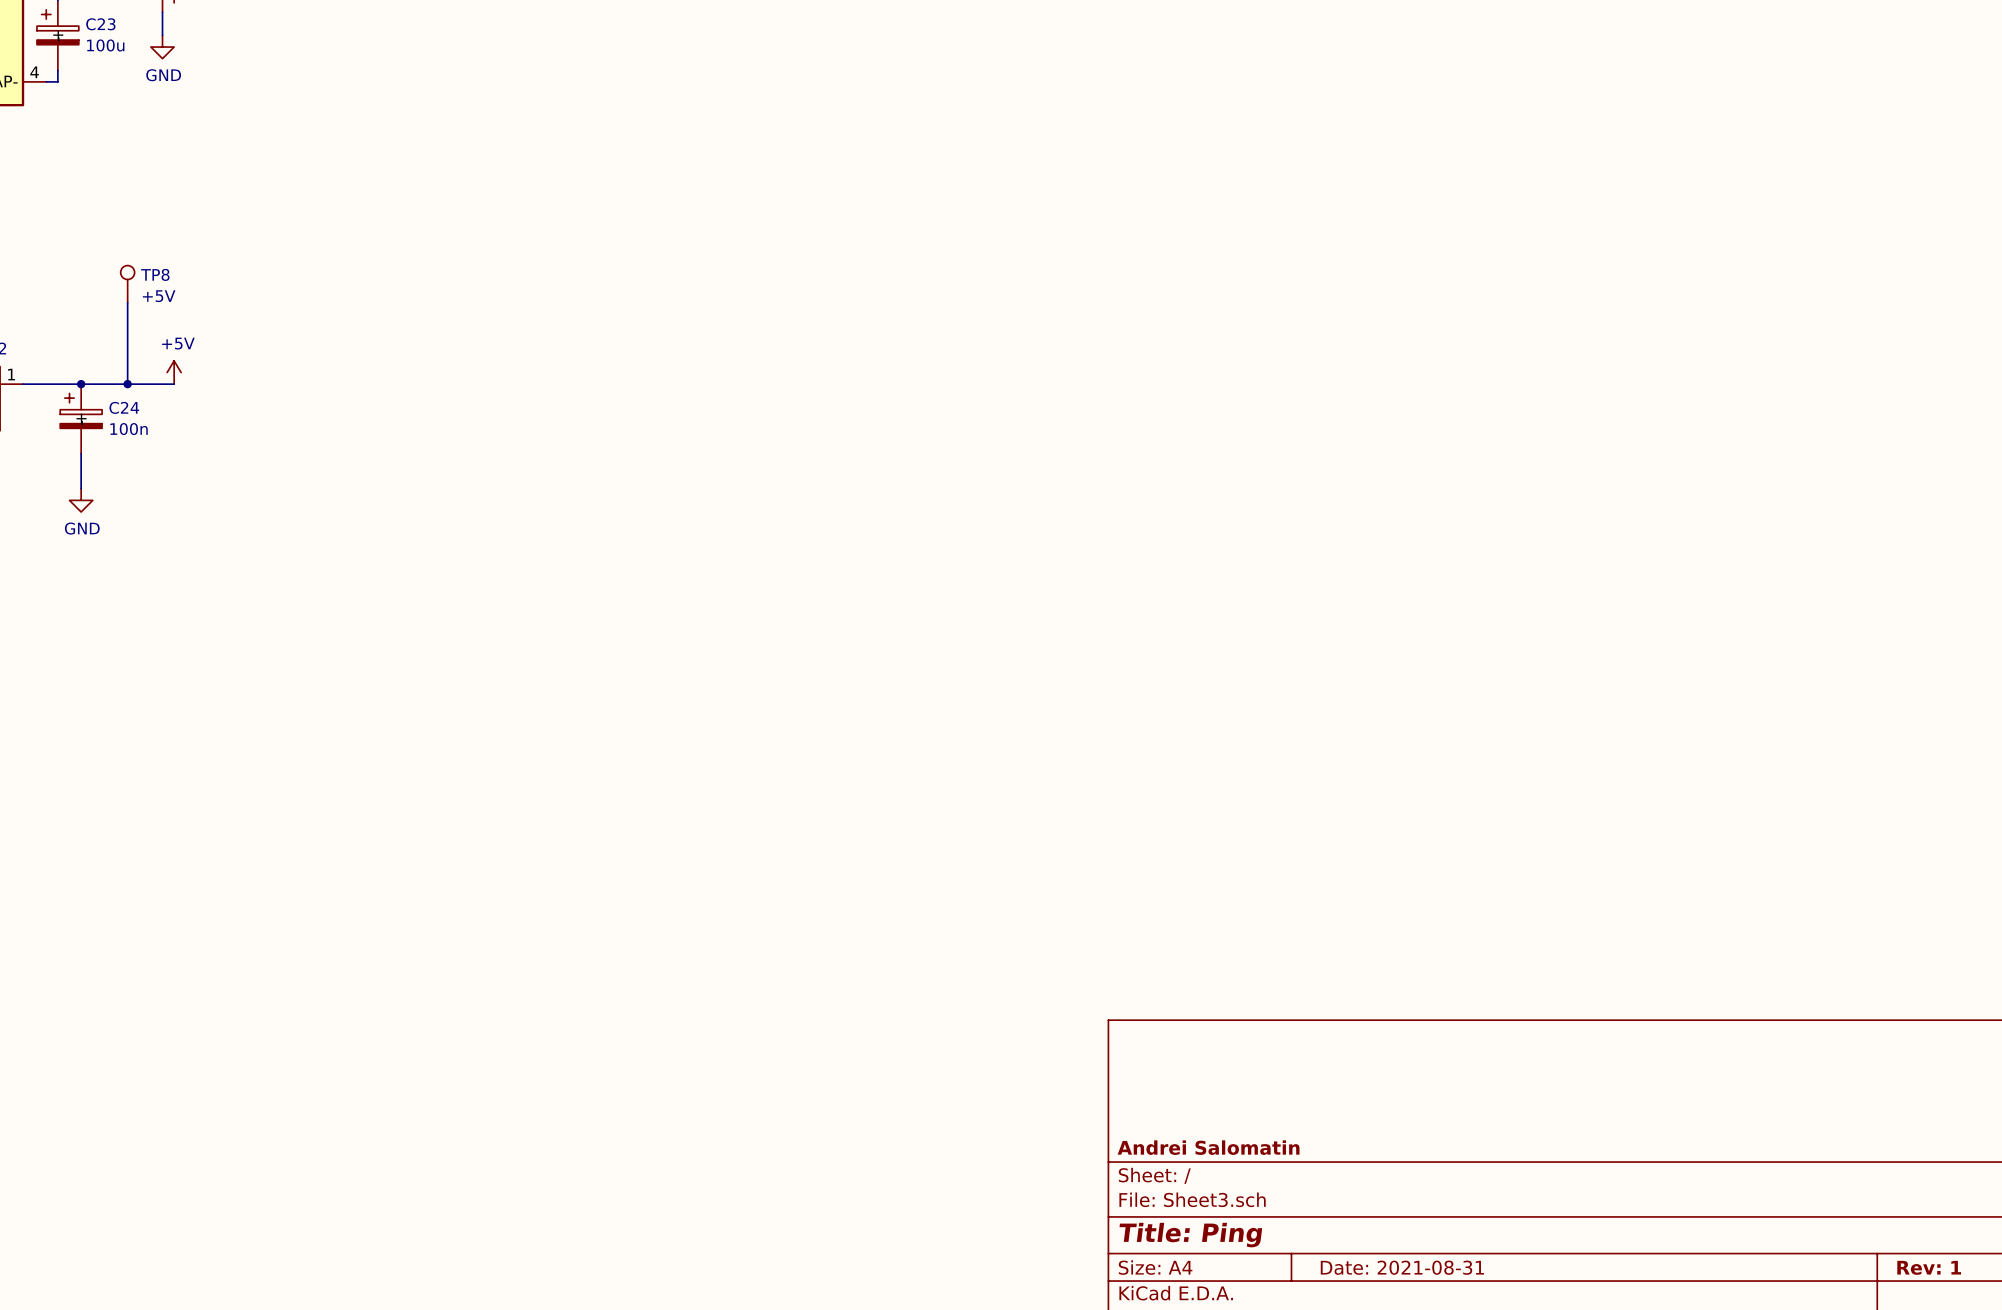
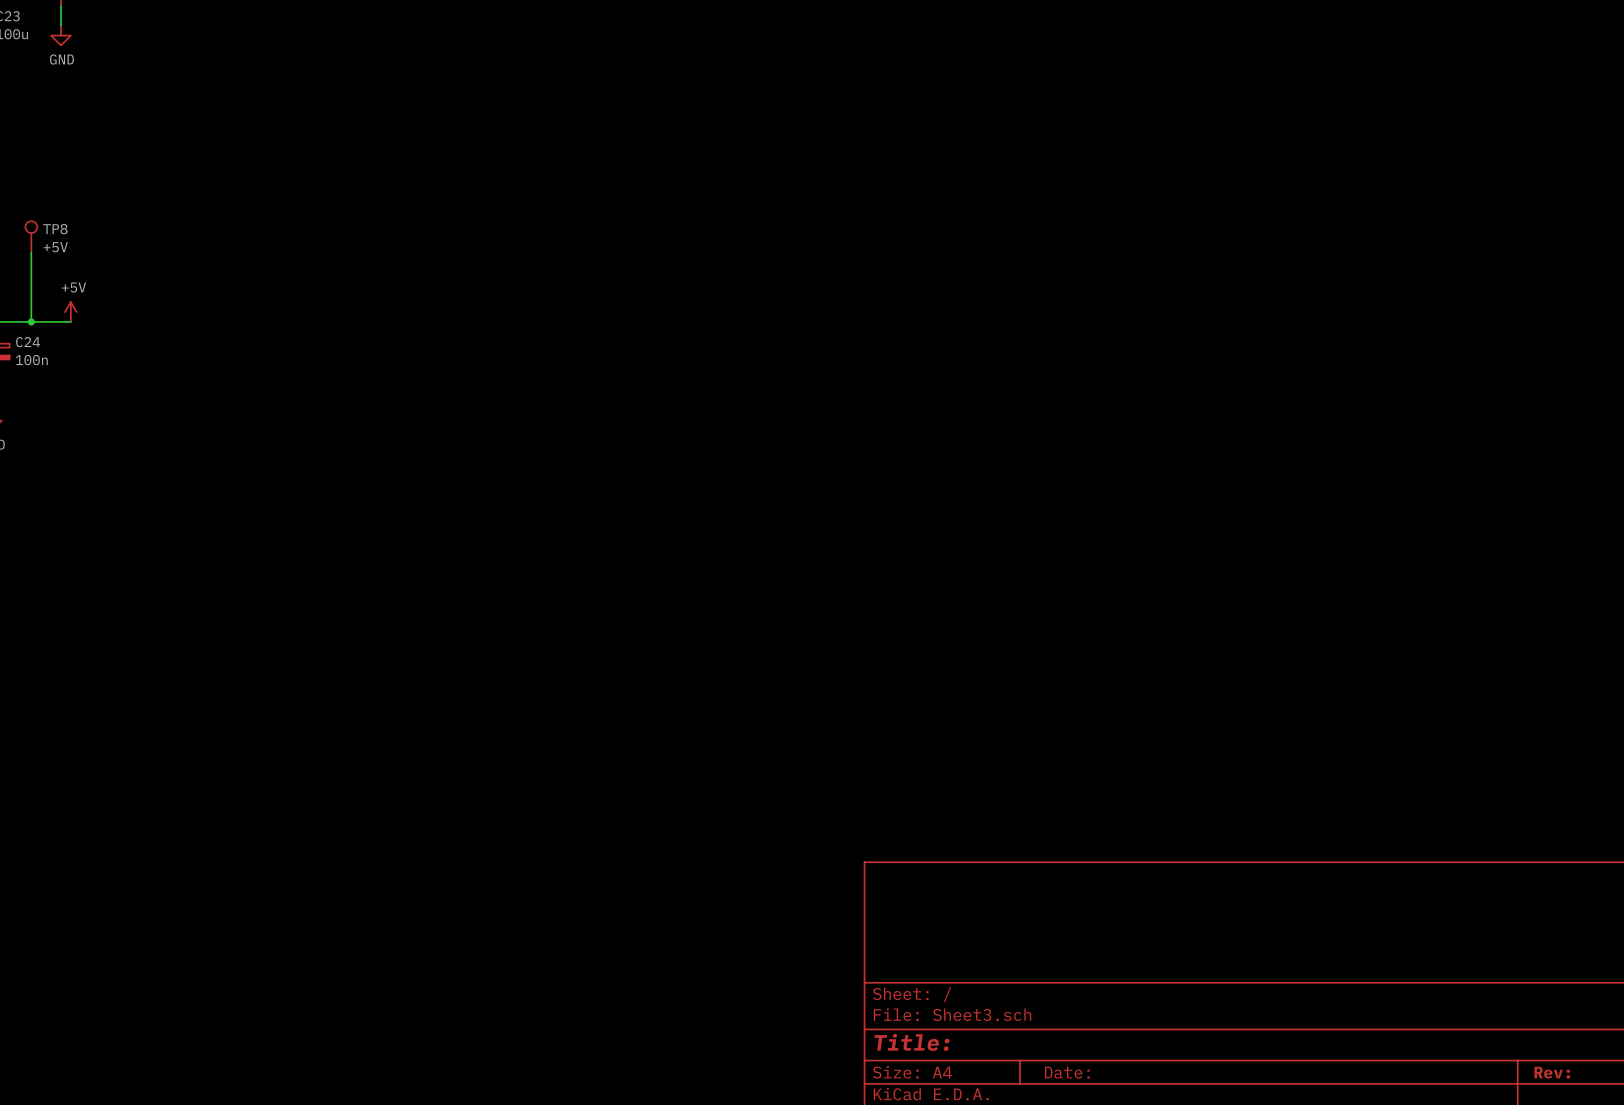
title block: Andrei Salomatin (1208, 1147) -> none
title block: Title: Ping (1190, 1235) -> Title: (911, 1042)
title block: Date: 2021-08-31 (1402, 1267) -> Date: (1067, 1072)
title block: Rev: 1 (1929, 1267) -> Rev: (1552, 1072)

